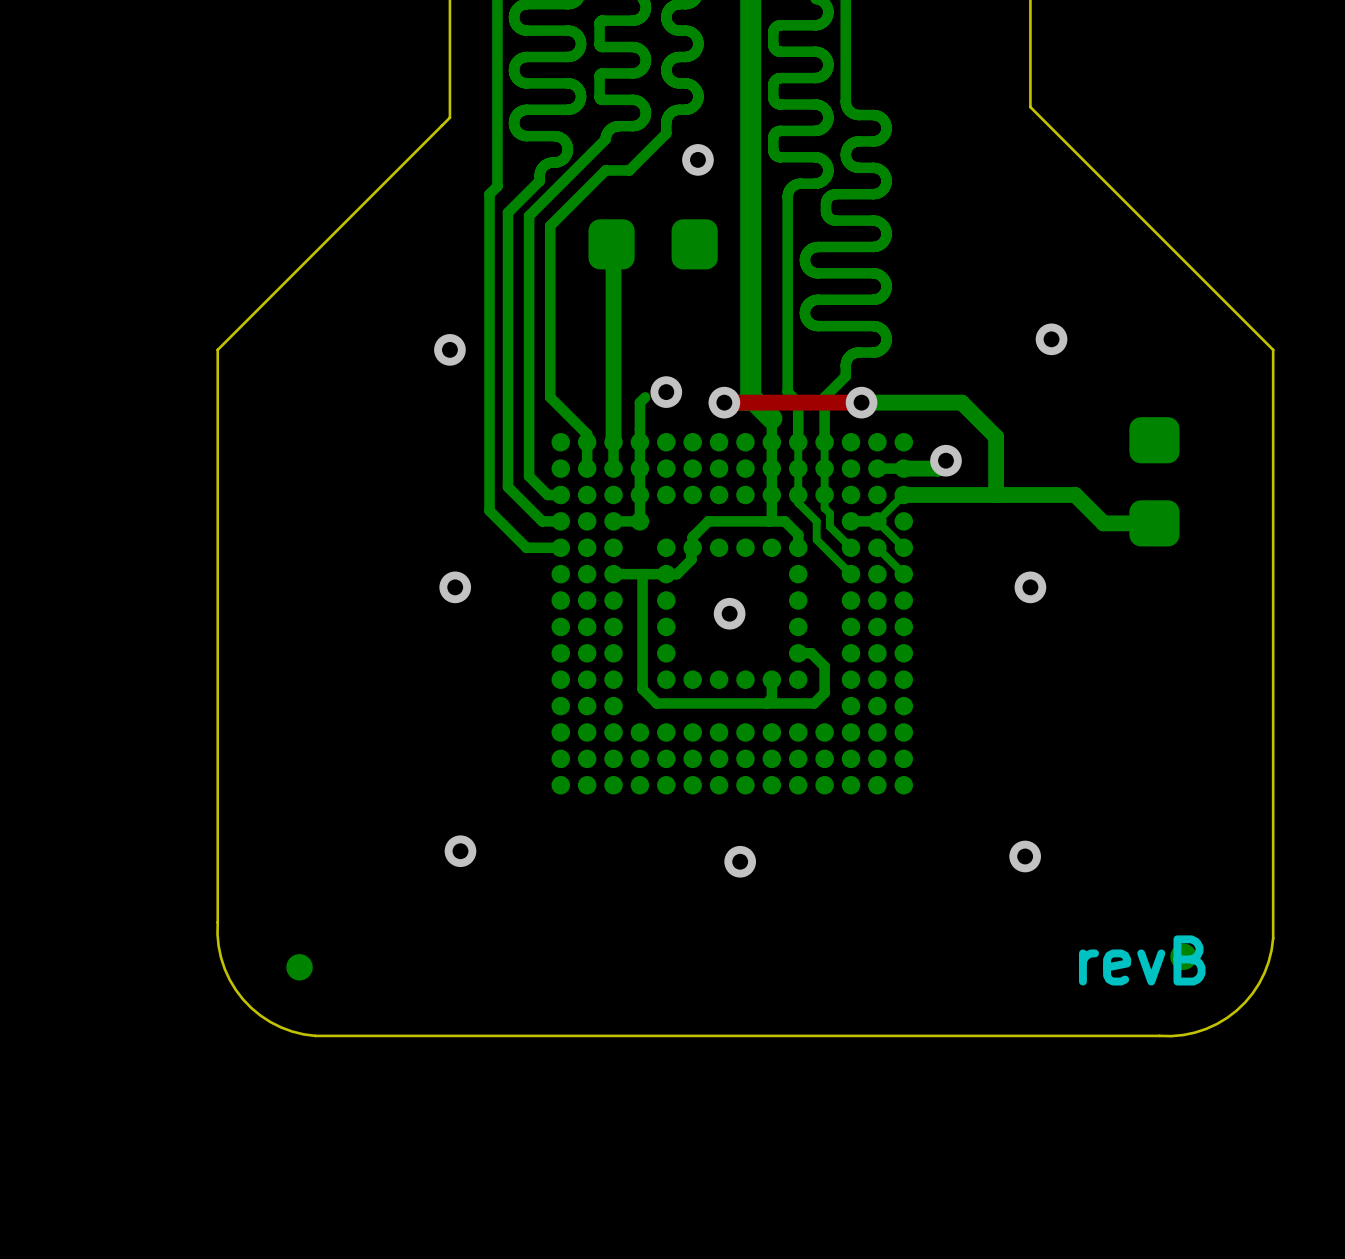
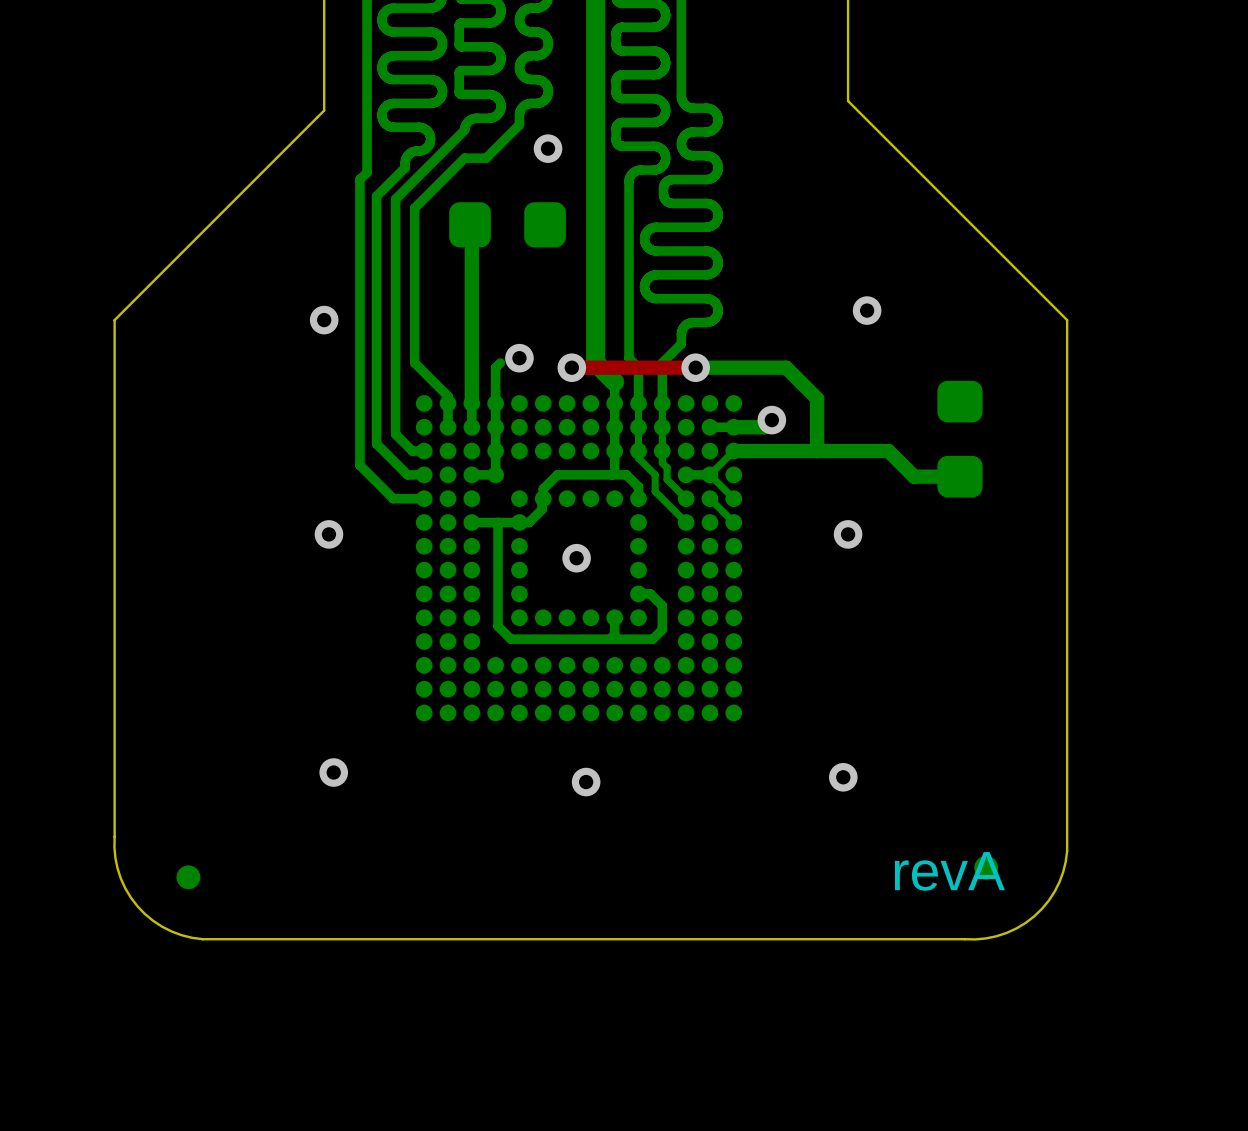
text: revB (1142, 960) -> revA (949, 871)

